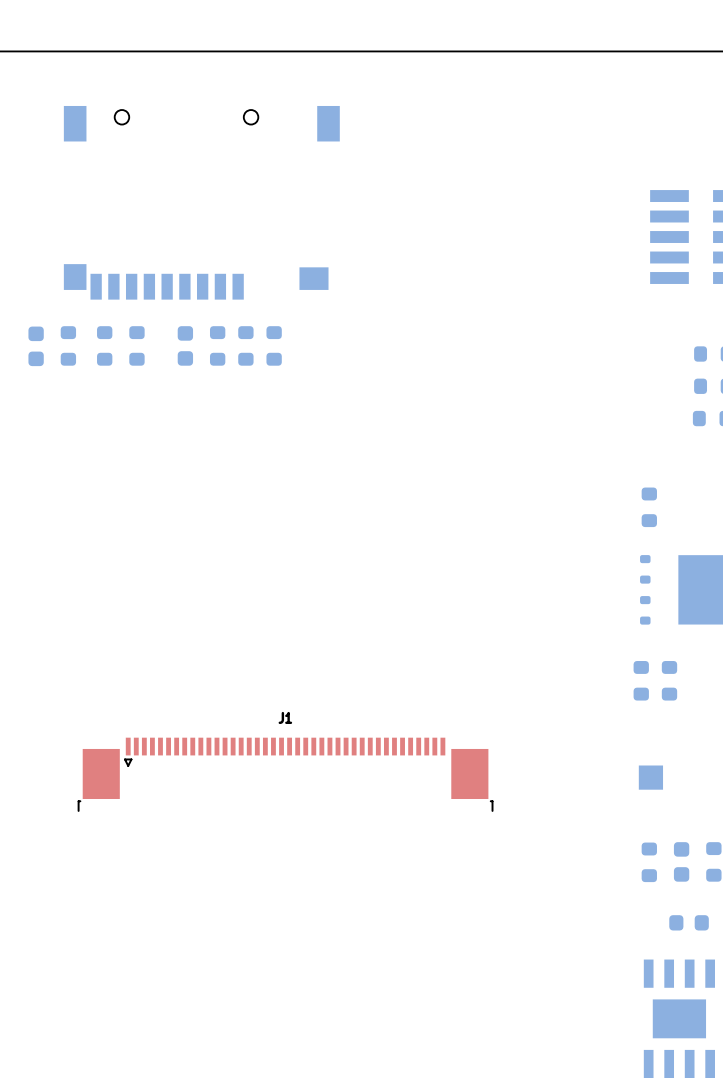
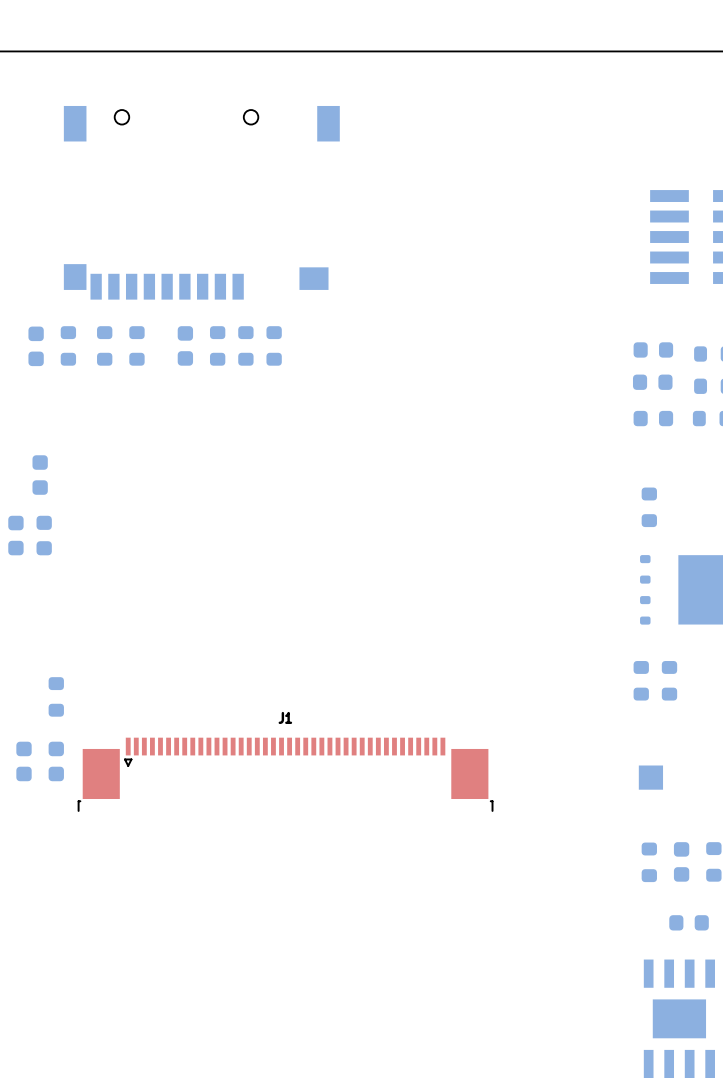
part: none -> (653, 349)
part: none -> (652, 382)
part: none -> (653, 418)
part: none -> (40, 475)
part: none -> (15, 535)
part: none -> (44, 535)
part: none -> (56, 696)
part: none -> (24, 761)
part: none -> (56, 761)

